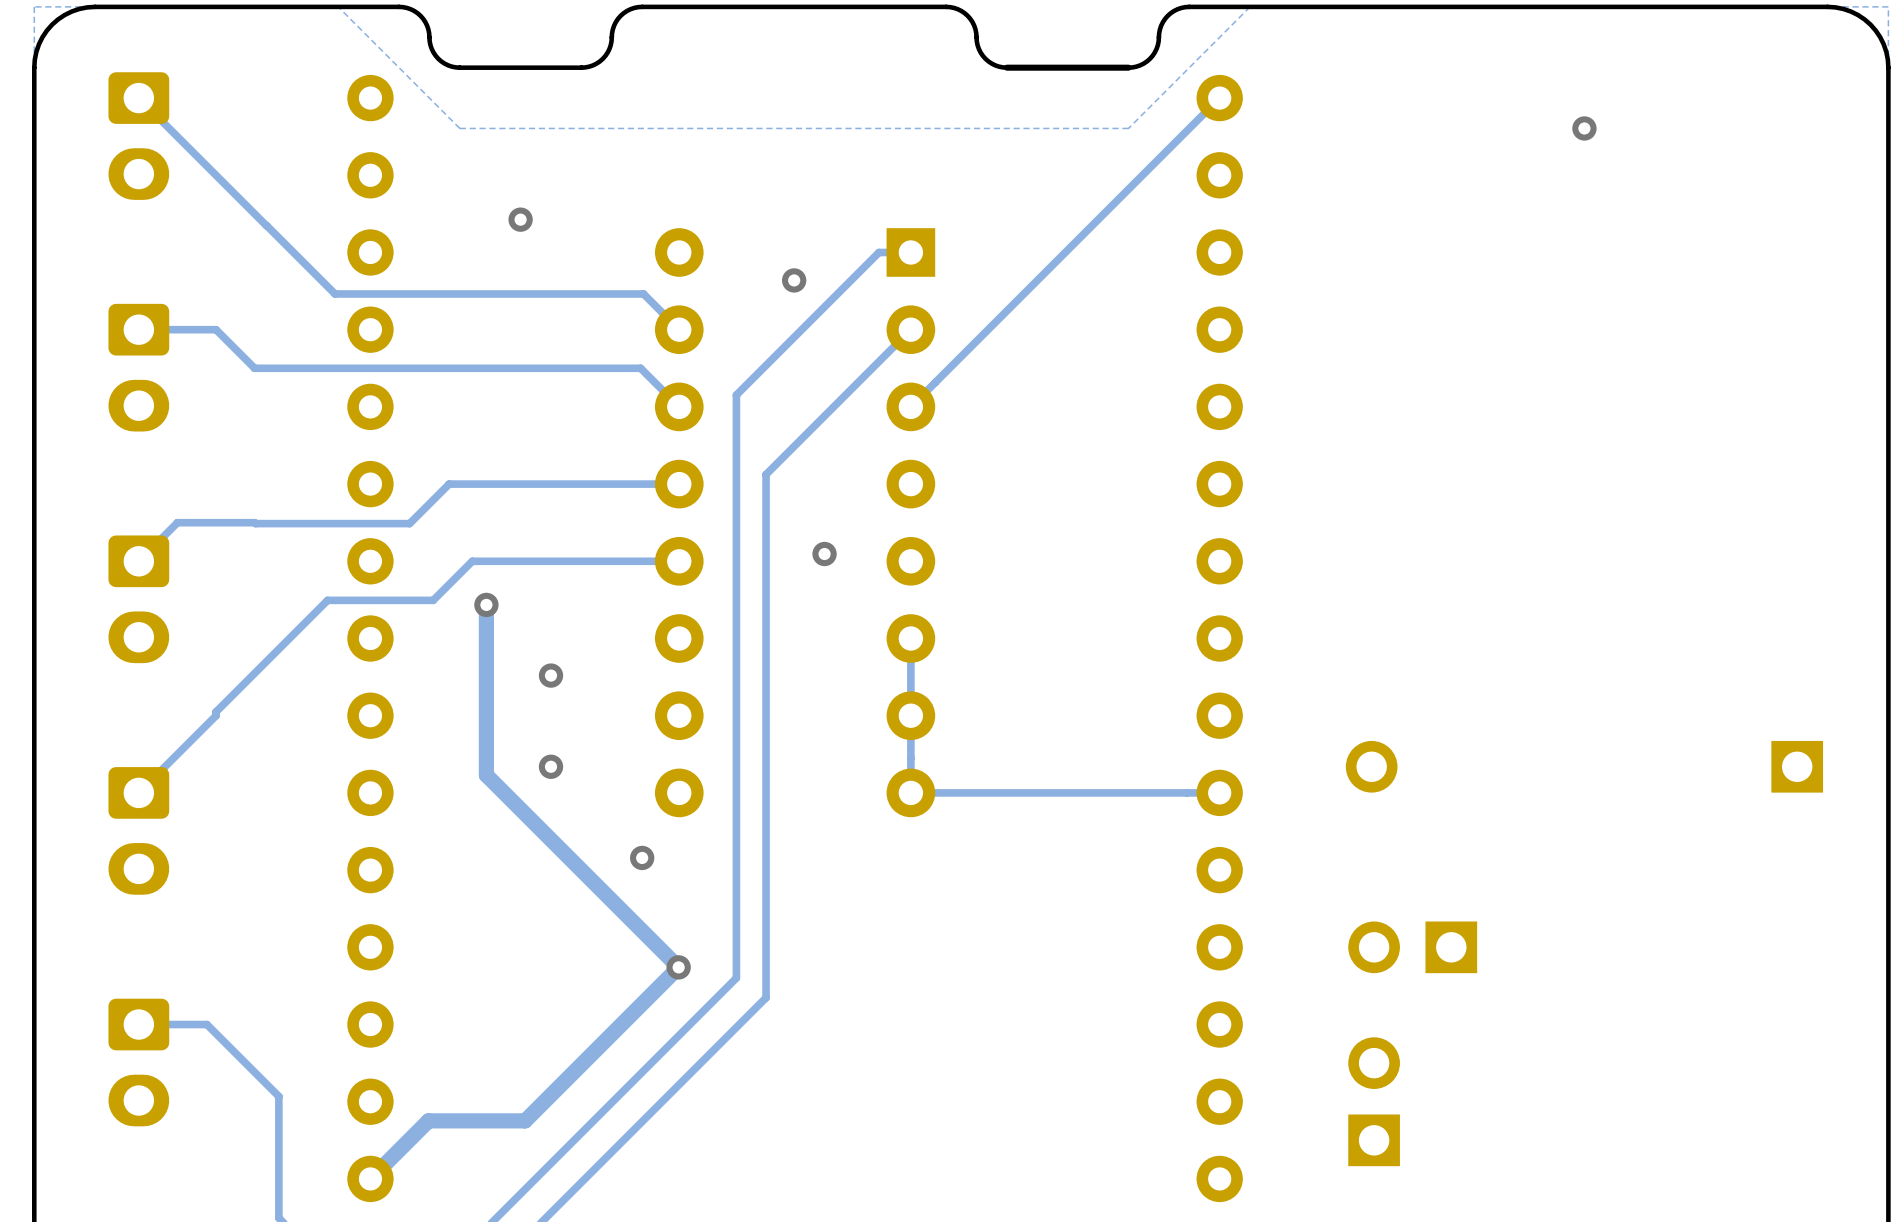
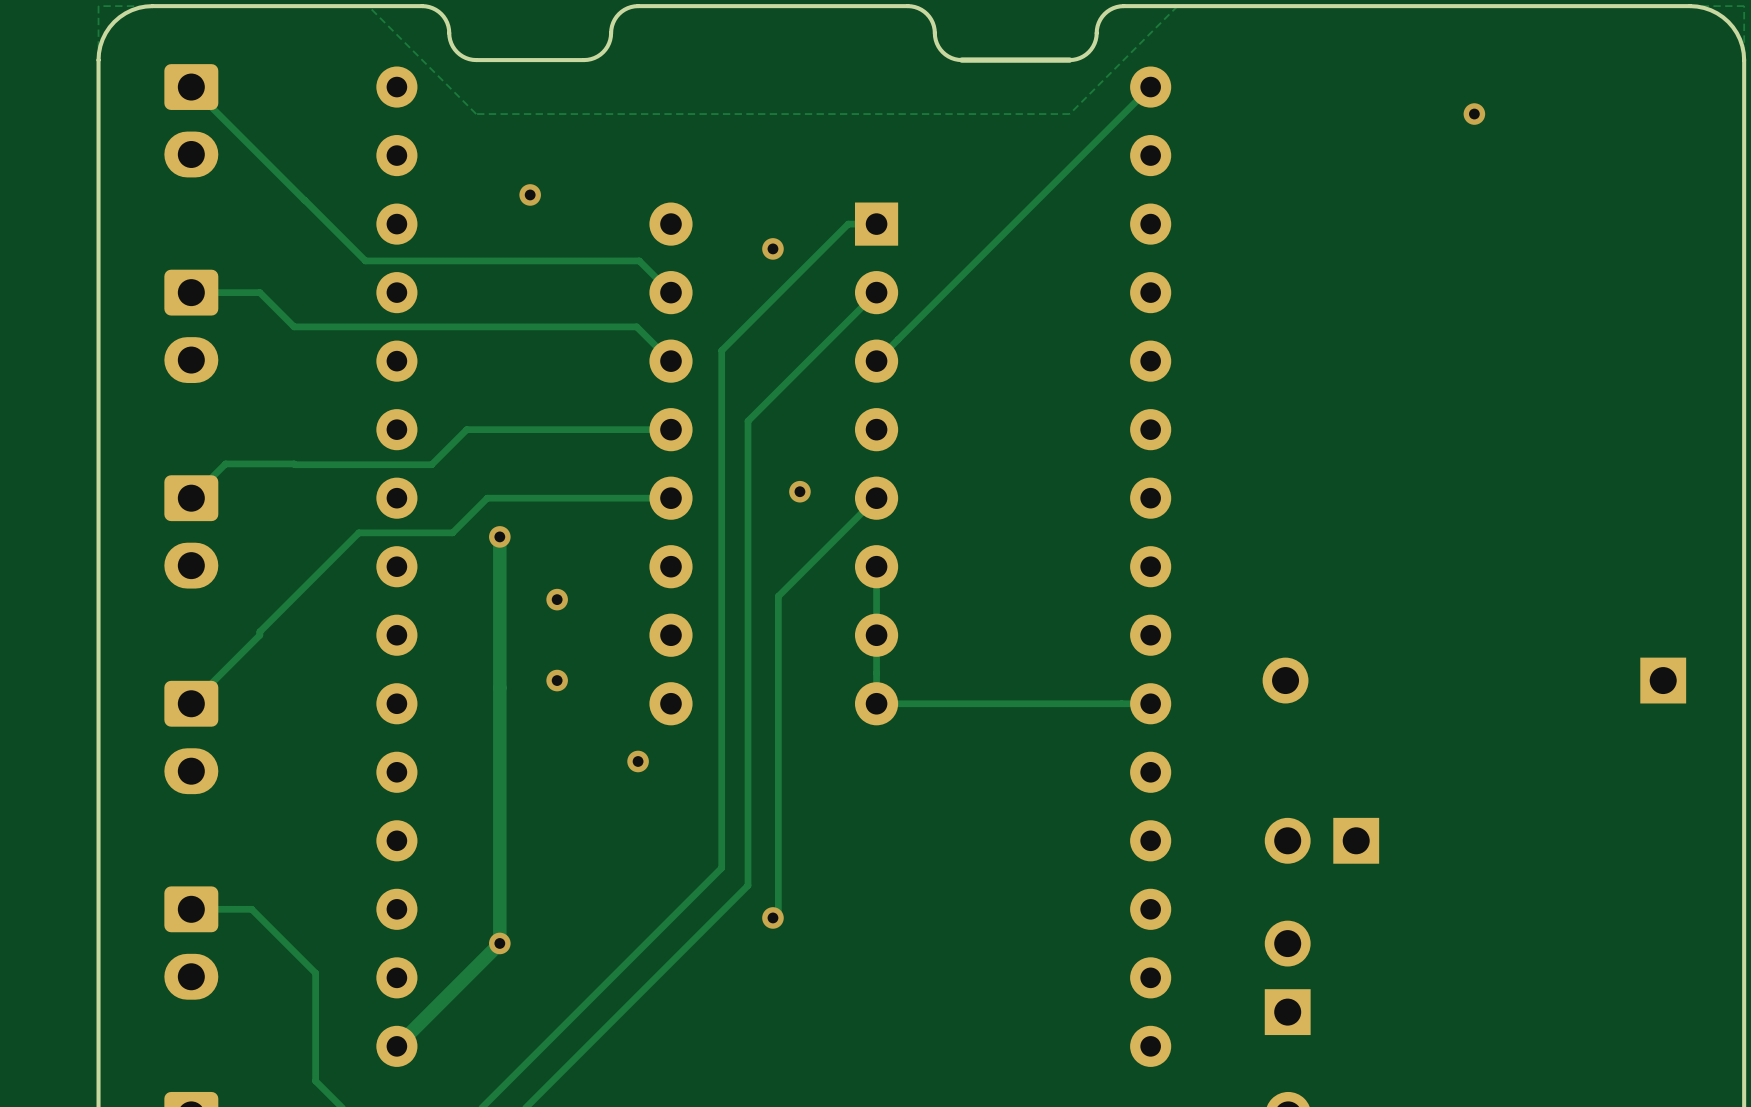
track: none -> (876, 498) (778, 596) (778, 912) (772, 917)
track: (486, 775) (678, 967) (525, 1120) (428, 1120) -> (499, 687) (499, 943) (448, 994)
via: (678, 967) -> none
via: none -> (772, 917)
via: none -> (499, 943)

